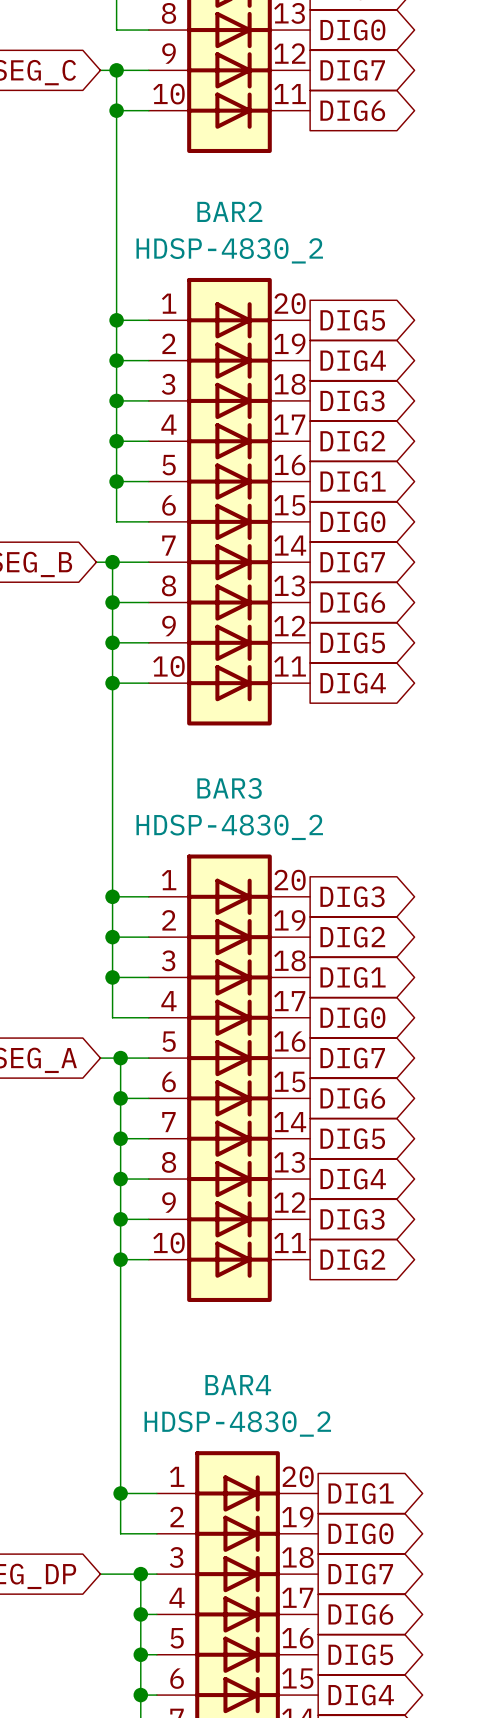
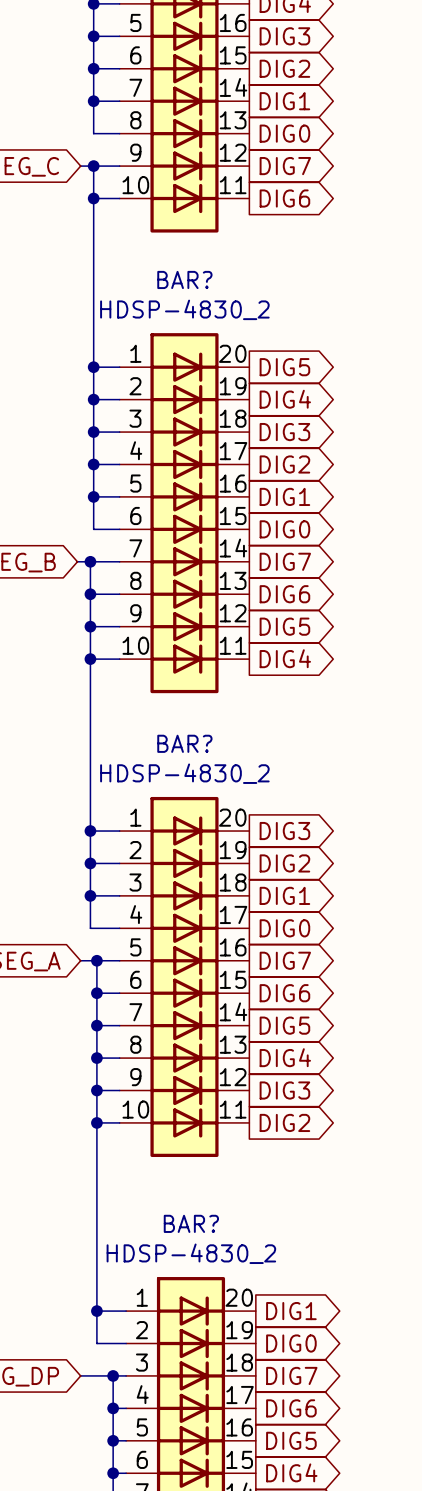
BAR2 name: BAR2 (229, 211) -> BAR? (184, 279)
BAR3 name: BAR3 (229, 788) -> BAR? (184, 743)
BAR4 name: BAR4 (238, 1385) -> BAR? (191, 1223)

